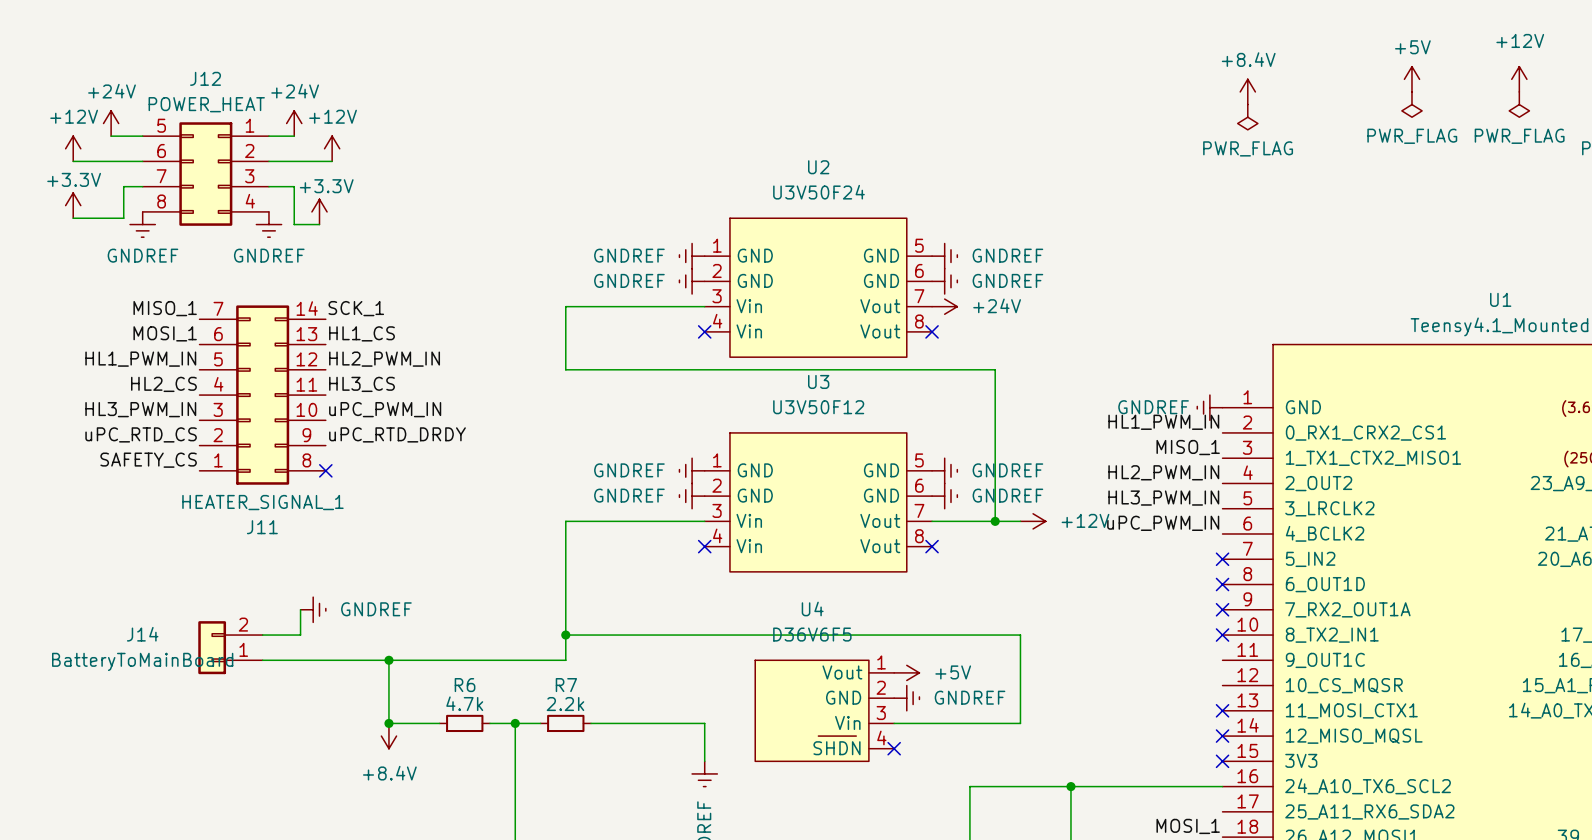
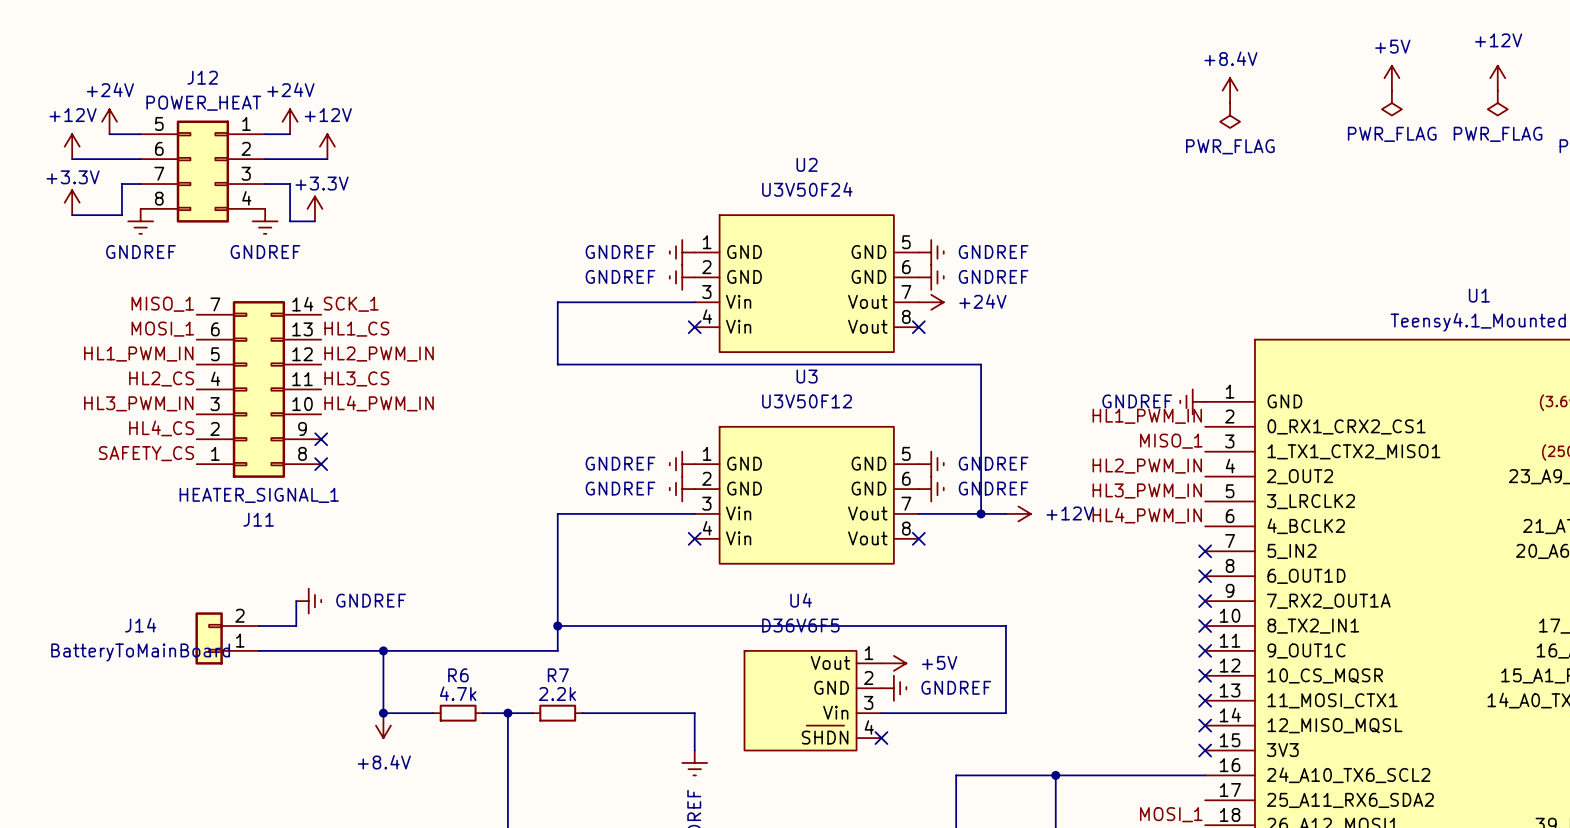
label: uPC_PWM_IN (385, 409) -> HL4_PWM_IN (379, 403)
label: uPC_RTD_CS (141, 434) -> HL4_CS (161, 428)
label: uPC_RTD_DRDY (397, 434) -> none
no-connect mark: none -> (321, 439)
label: uPC_PWM_IN (1163, 523) -> HL4_PWM_IN (1147, 515)
no-connect mark: none -> (1205, 650)
no-connect mark: none -> (1205, 675)

